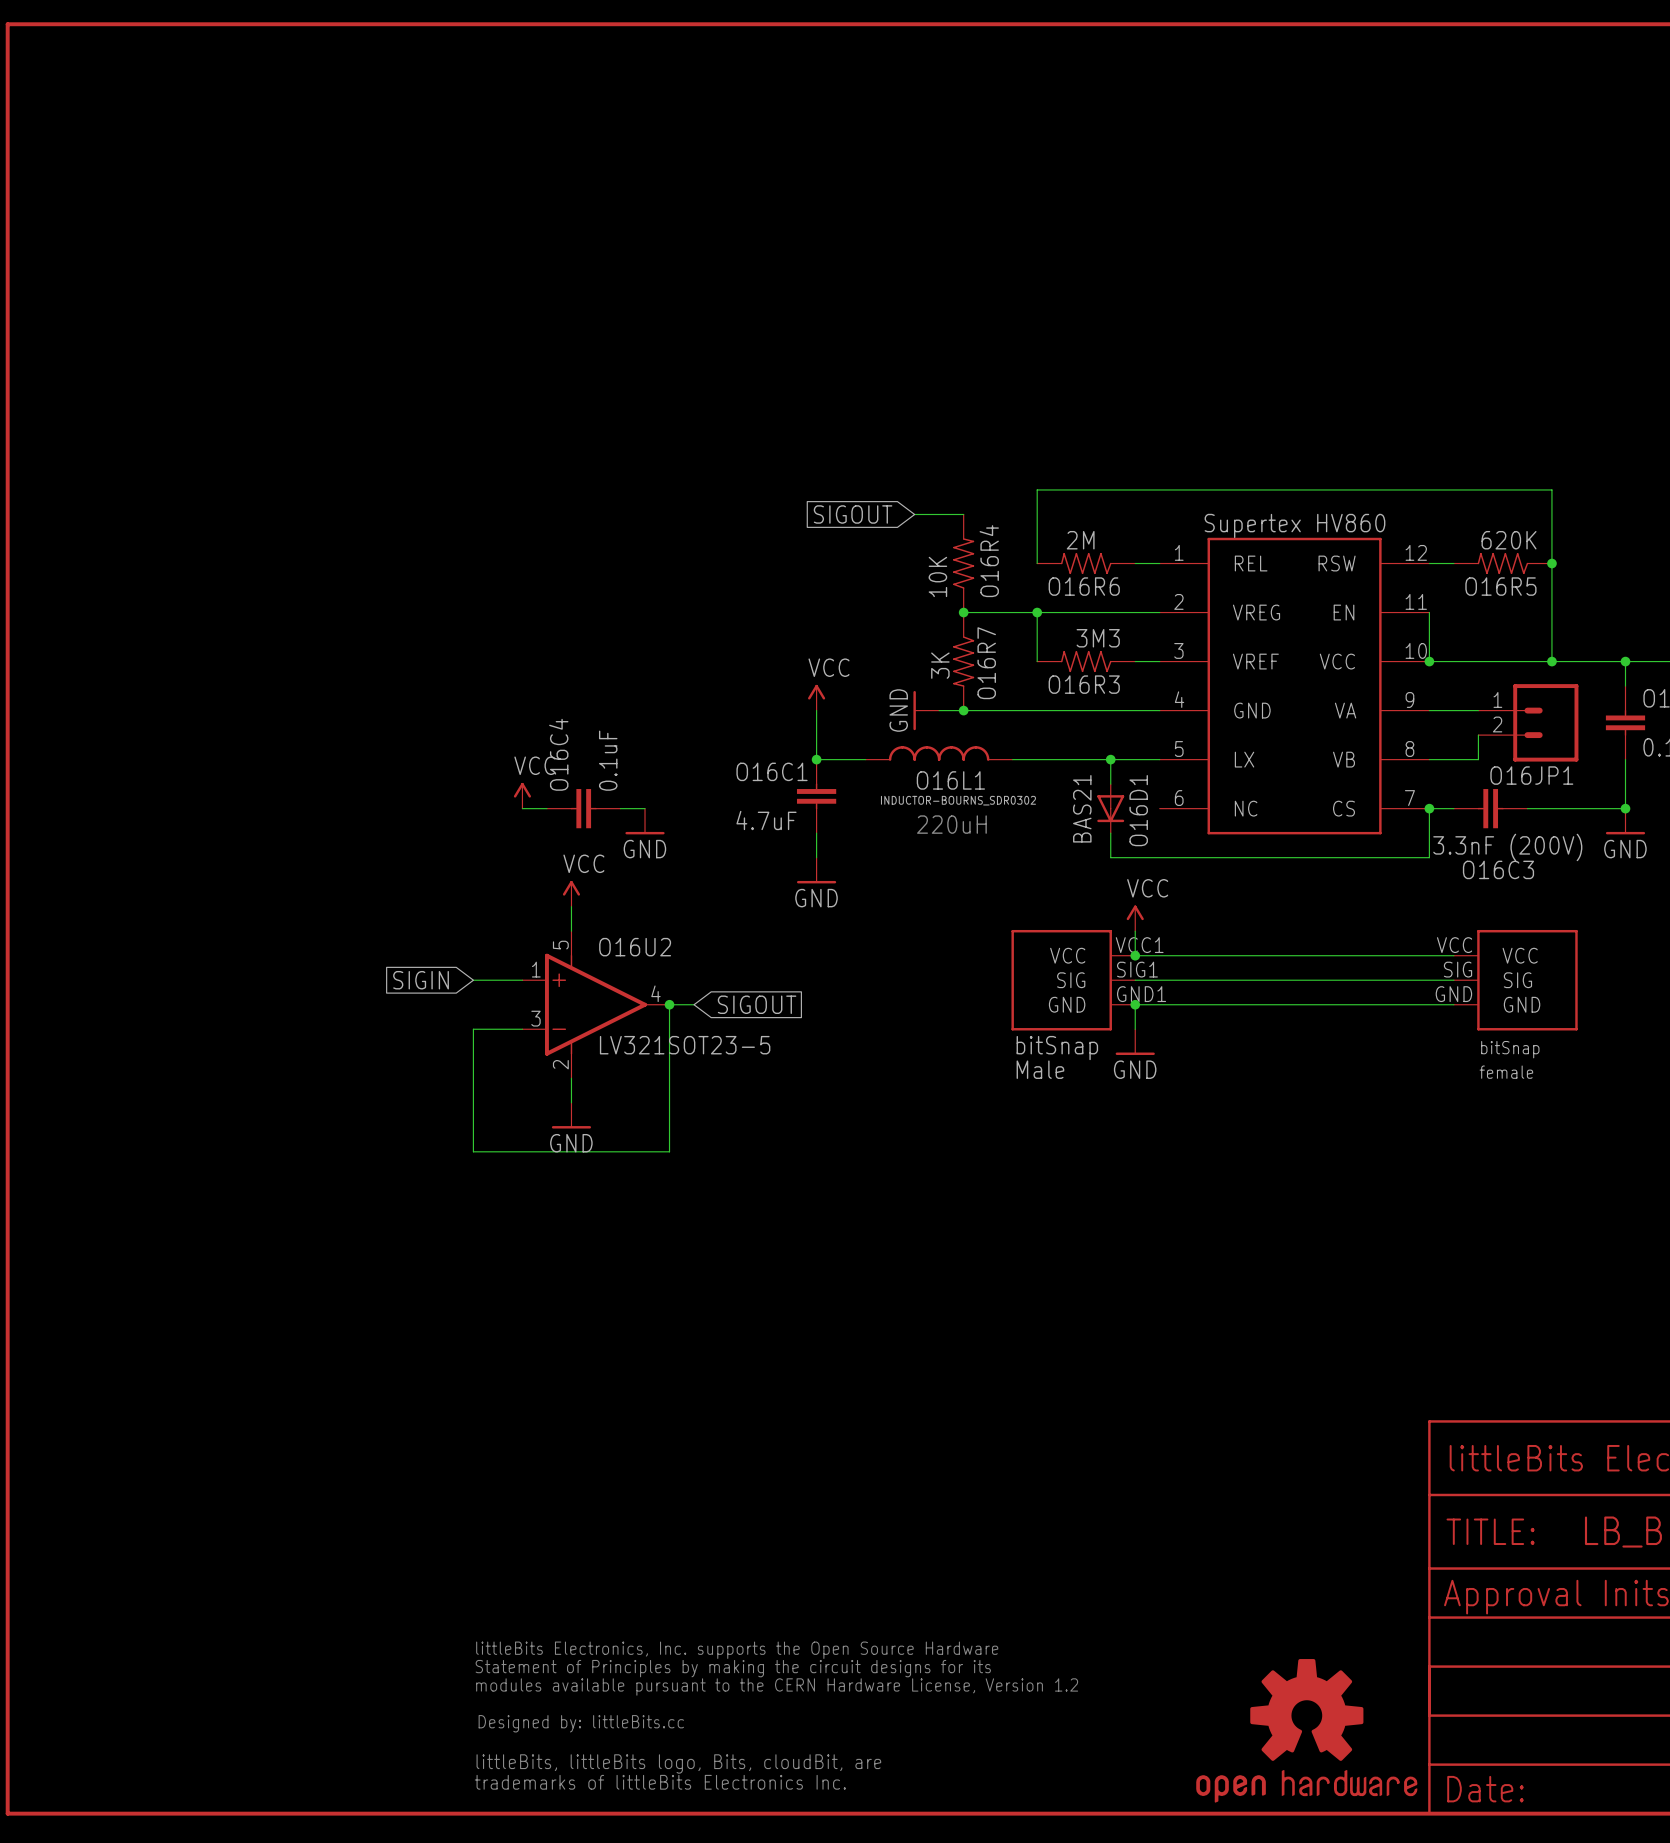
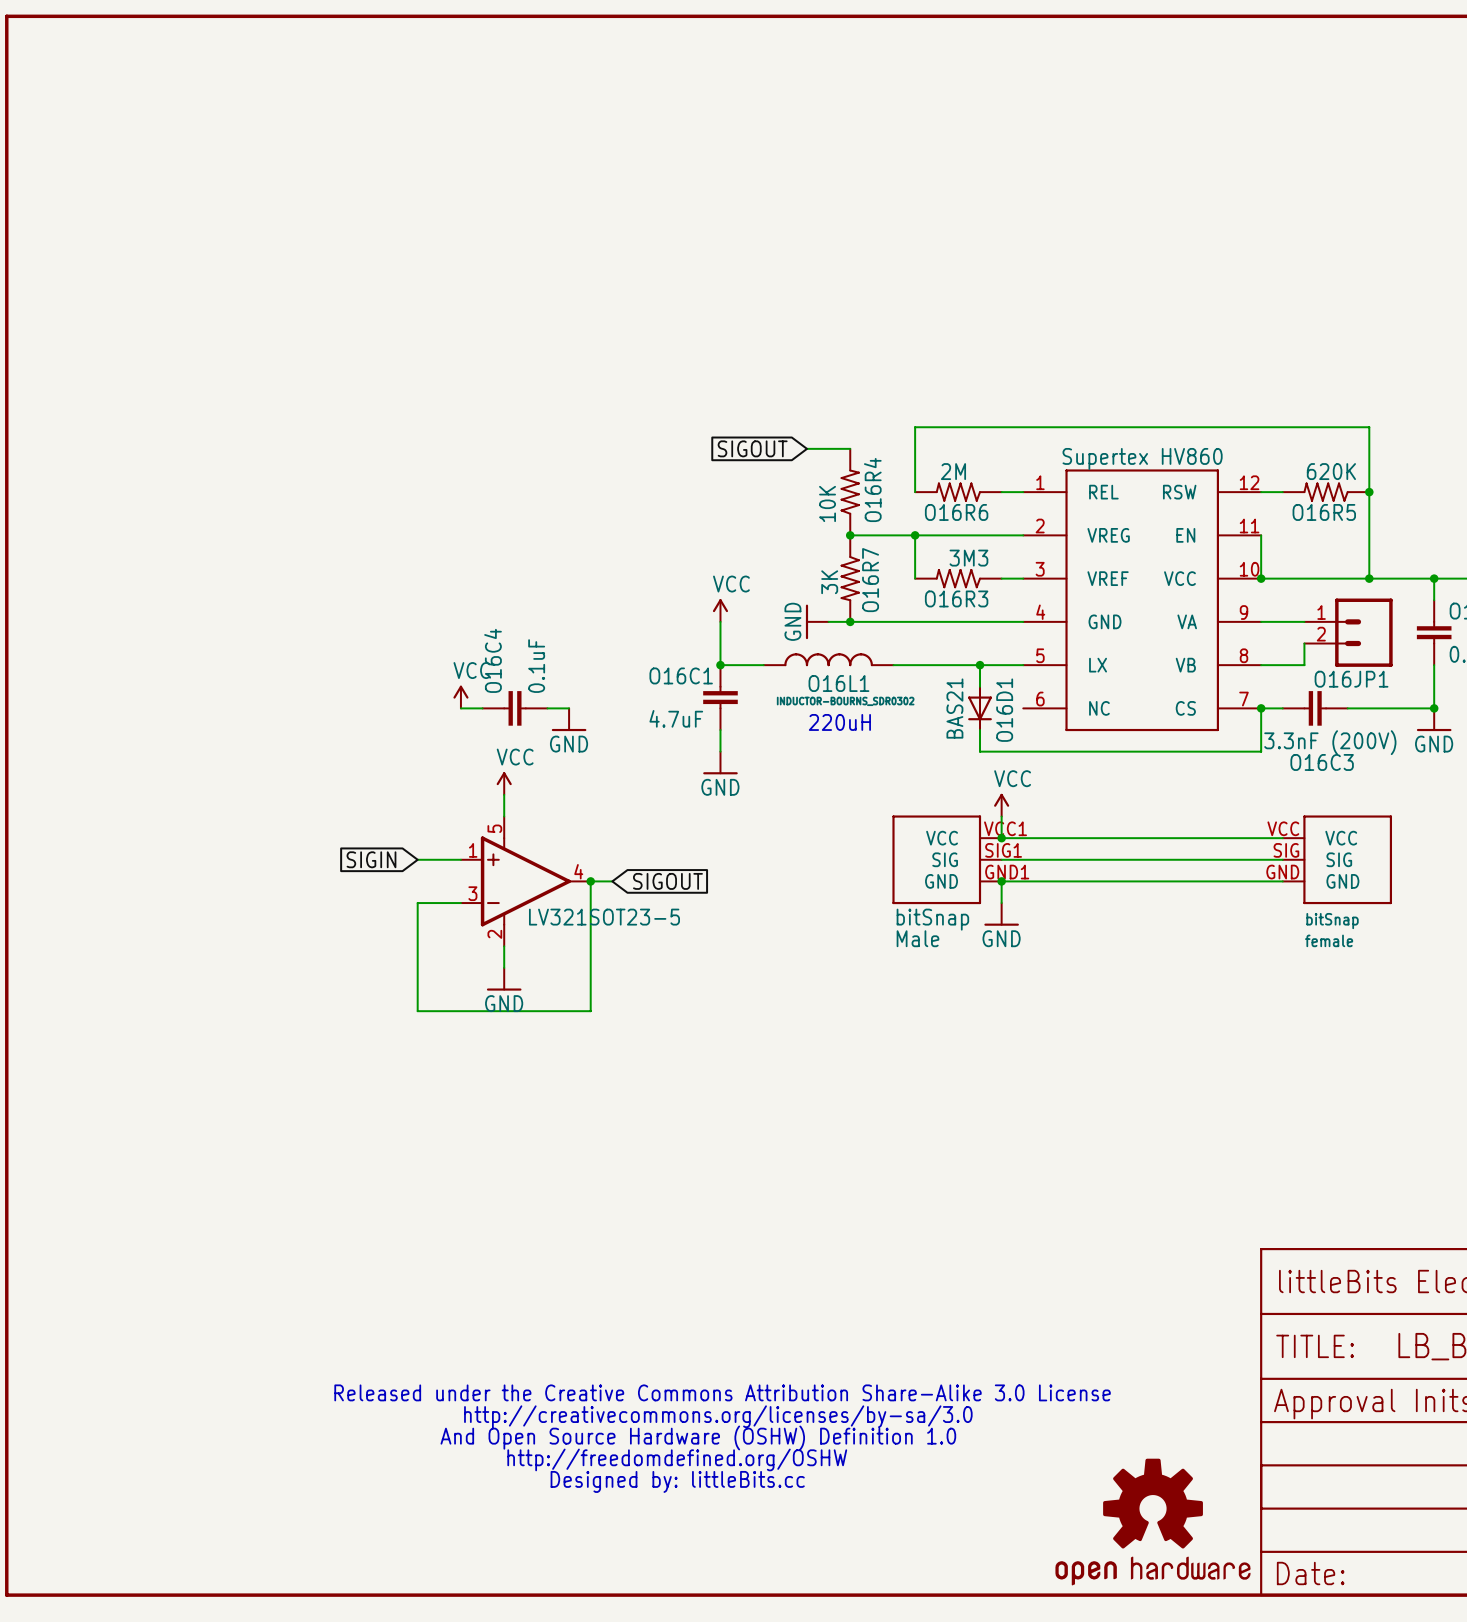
O16U2 name: O16U2 (635, 947) -> none
part: none -> (722, 1438)
part: (776, 1715) -> none

